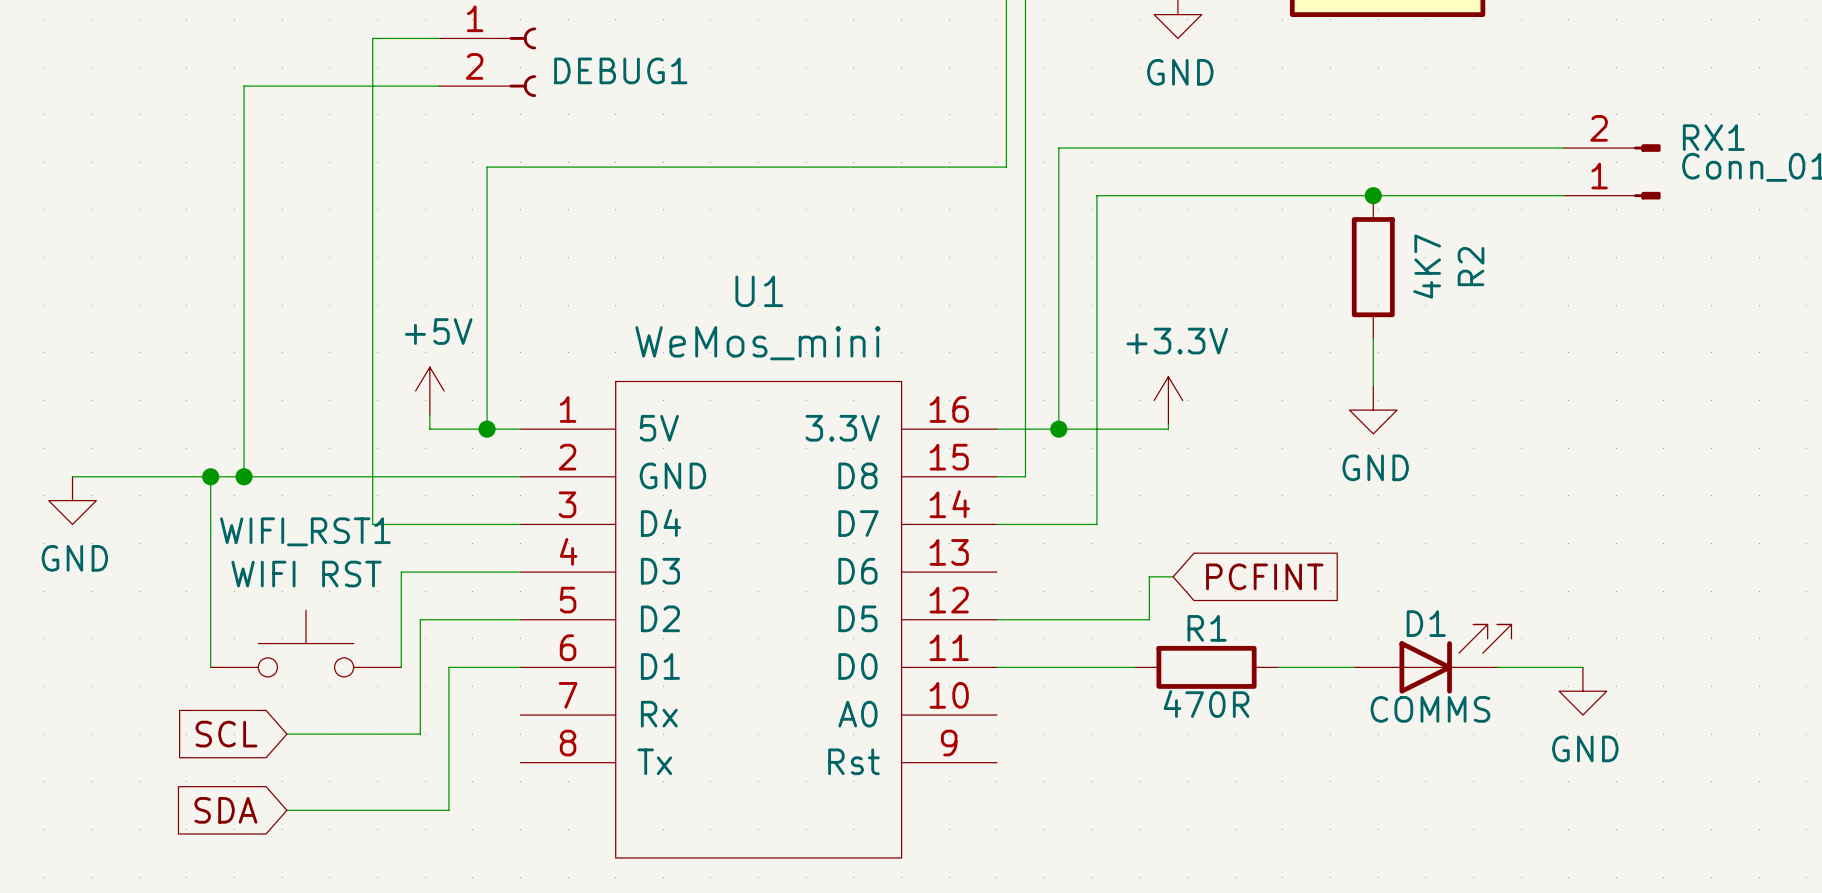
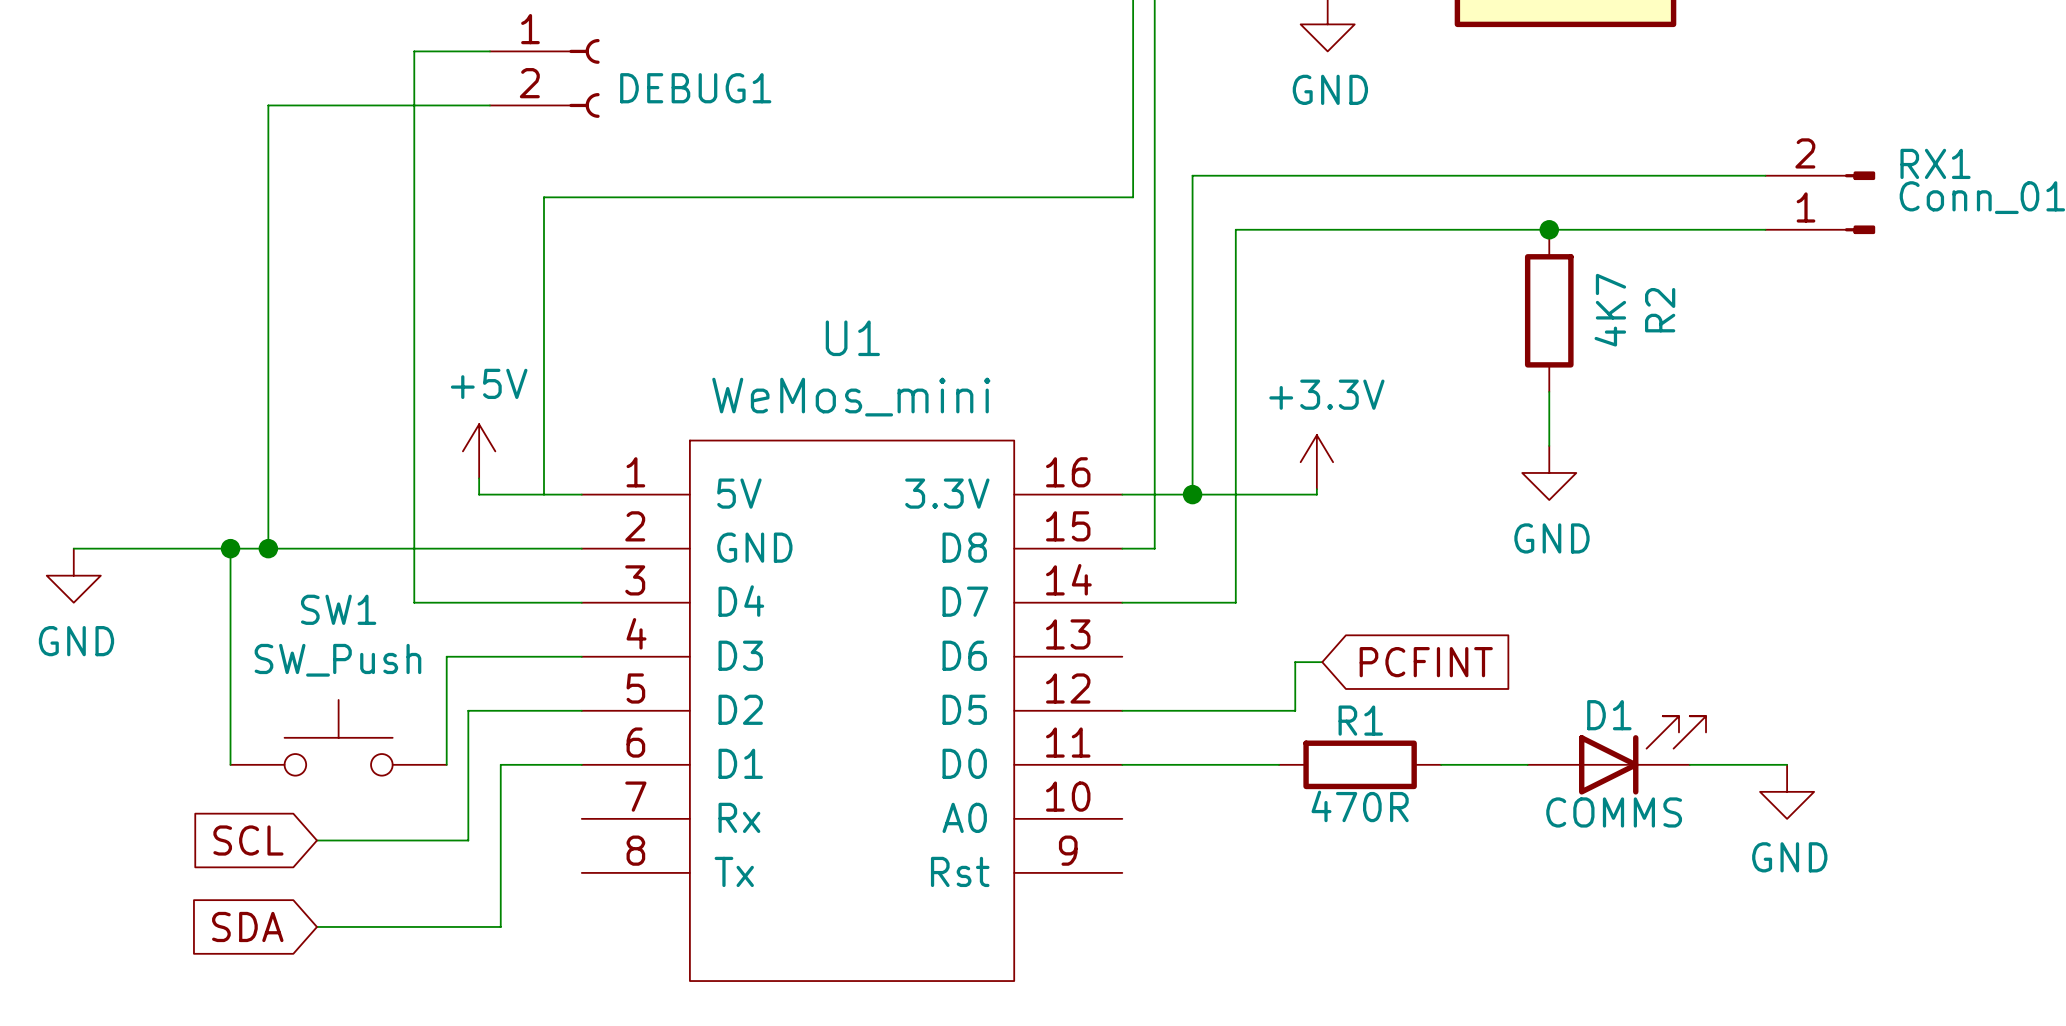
junction: (487, 429) -> none
WIFI_RST1 name: WIFI_RST1 (305, 531) -> SW1 (338, 609)
WIFI_RST1 value: WIFI RST (306, 574) -> SW_Push (337, 660)

